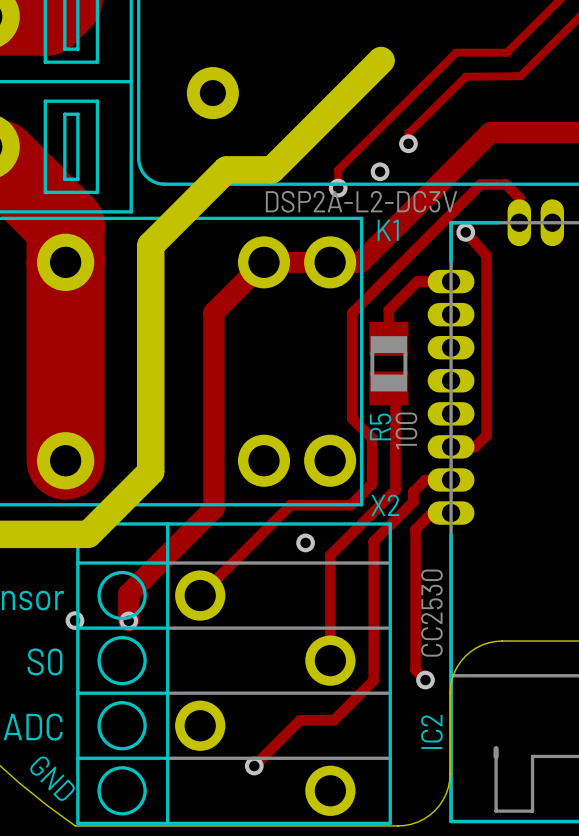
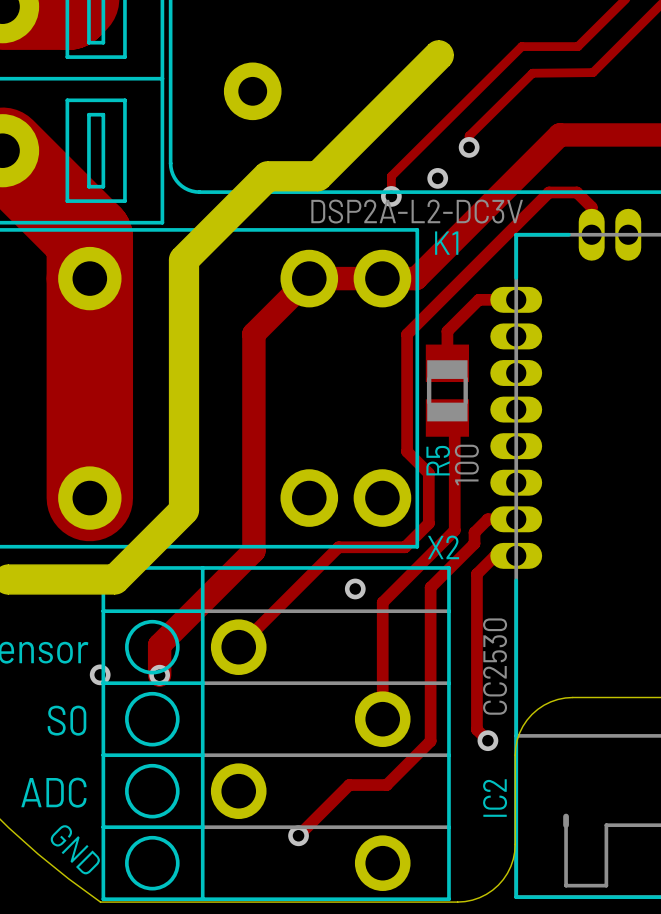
track: (465, 232) (486, 255) (486, 435) (475, 446) (451, 446) -> none
via: (465, 232) -> none

